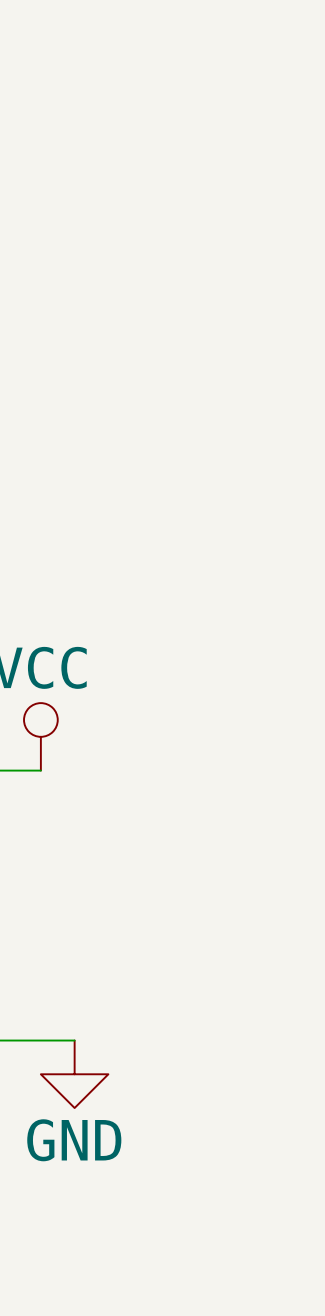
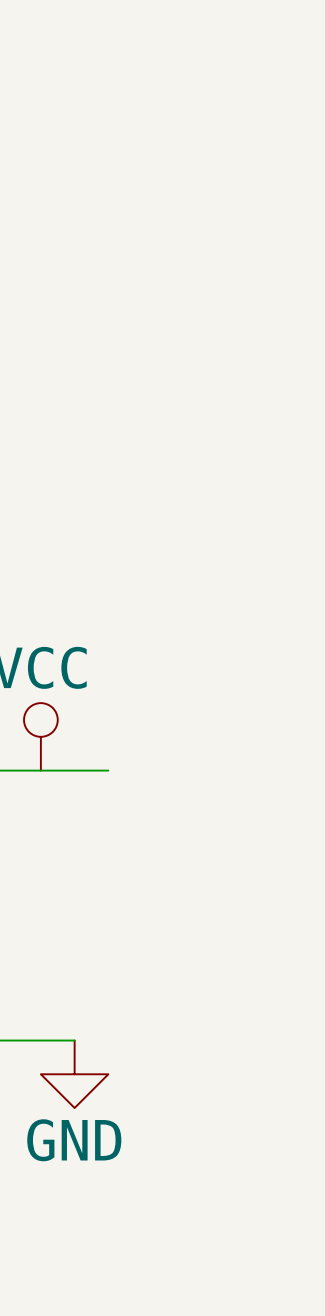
wire: none -> (40, 770) (108, 770)

